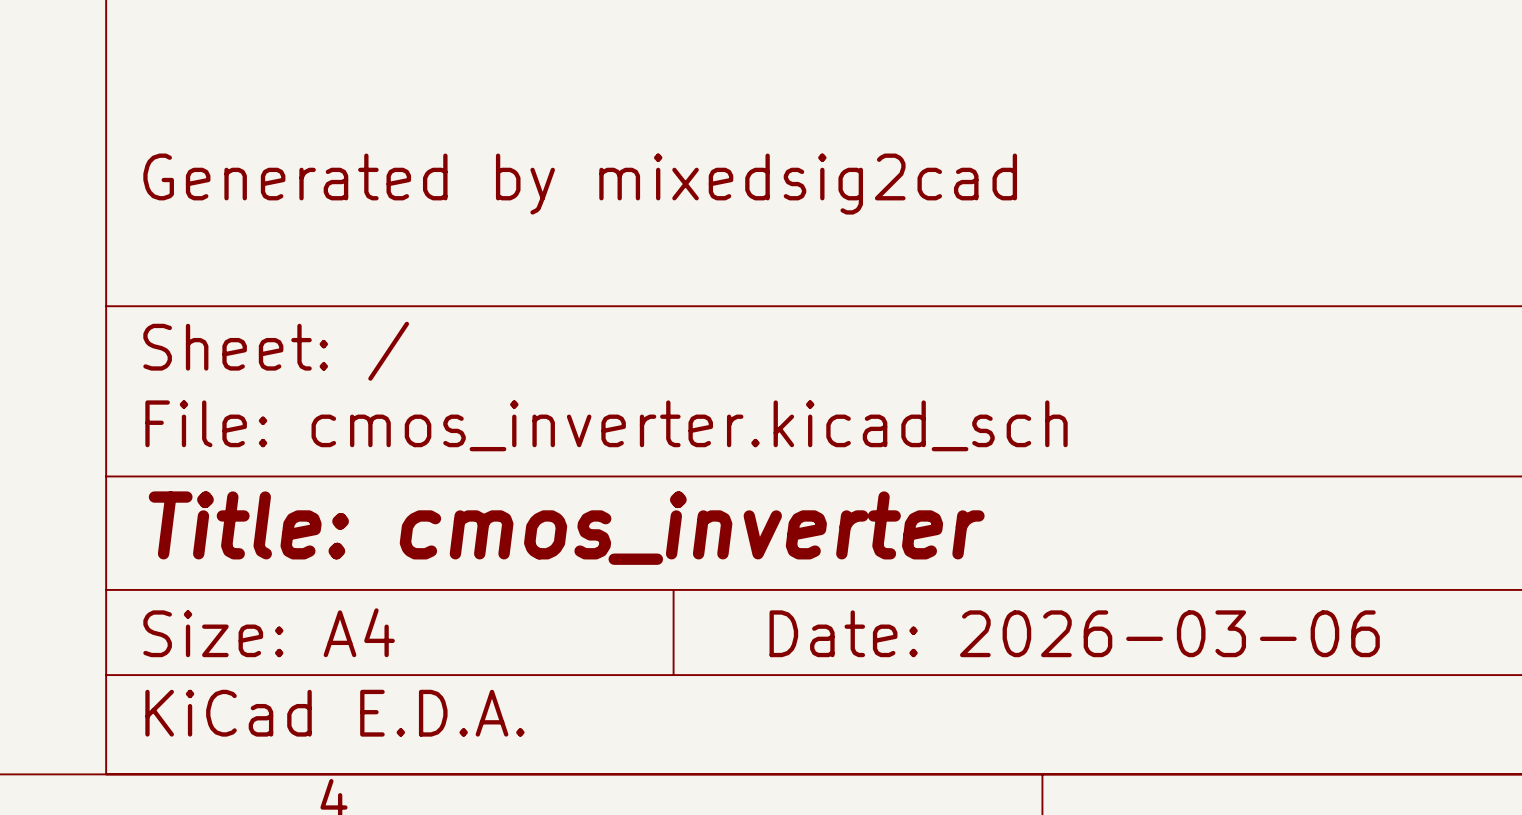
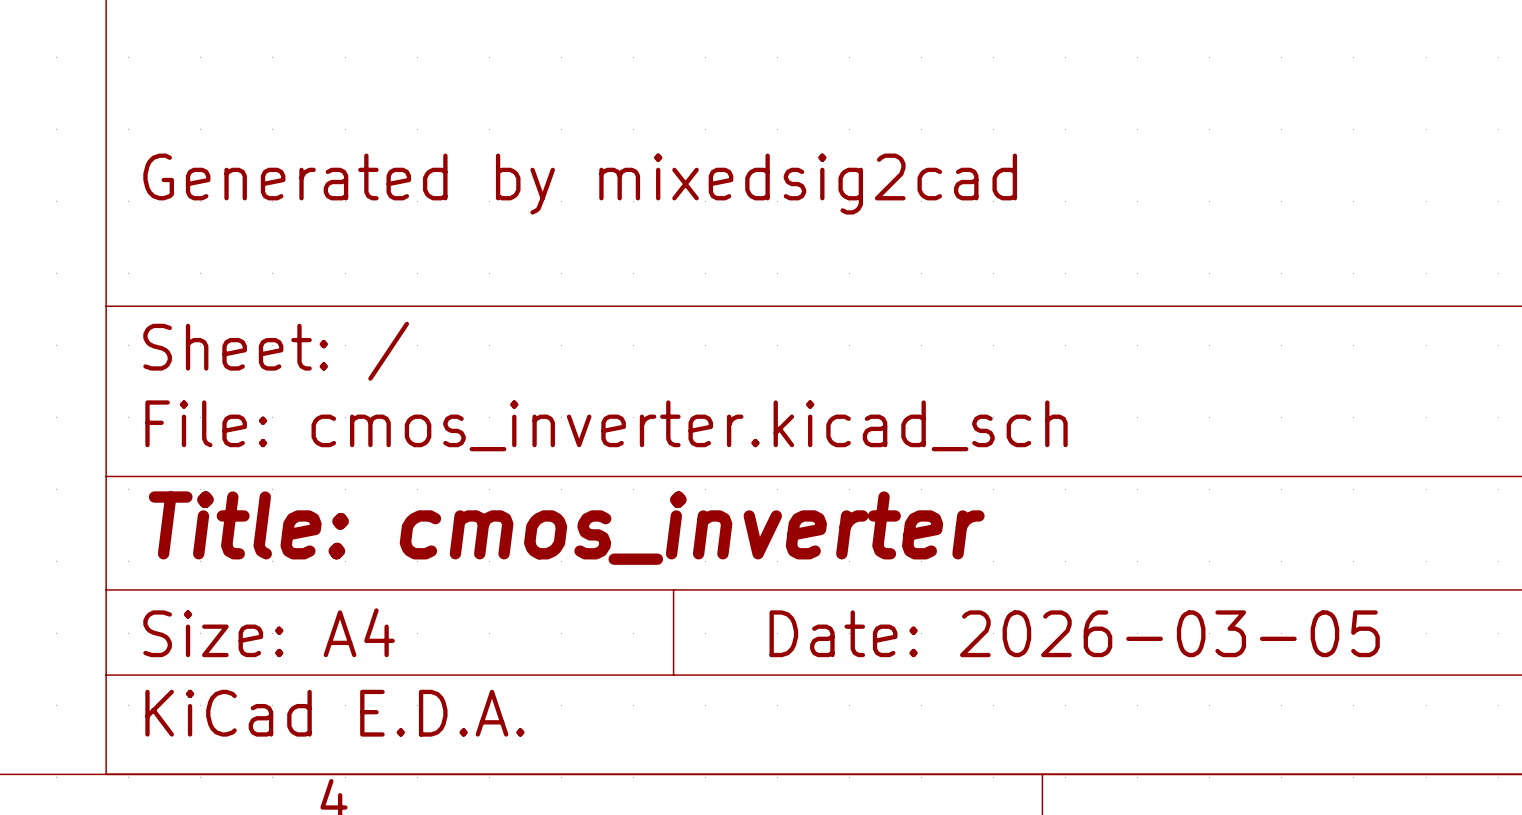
title block: Date: 2026-03-06 (1074, 633) -> Date: 2026-03-05 (1074, 633)

